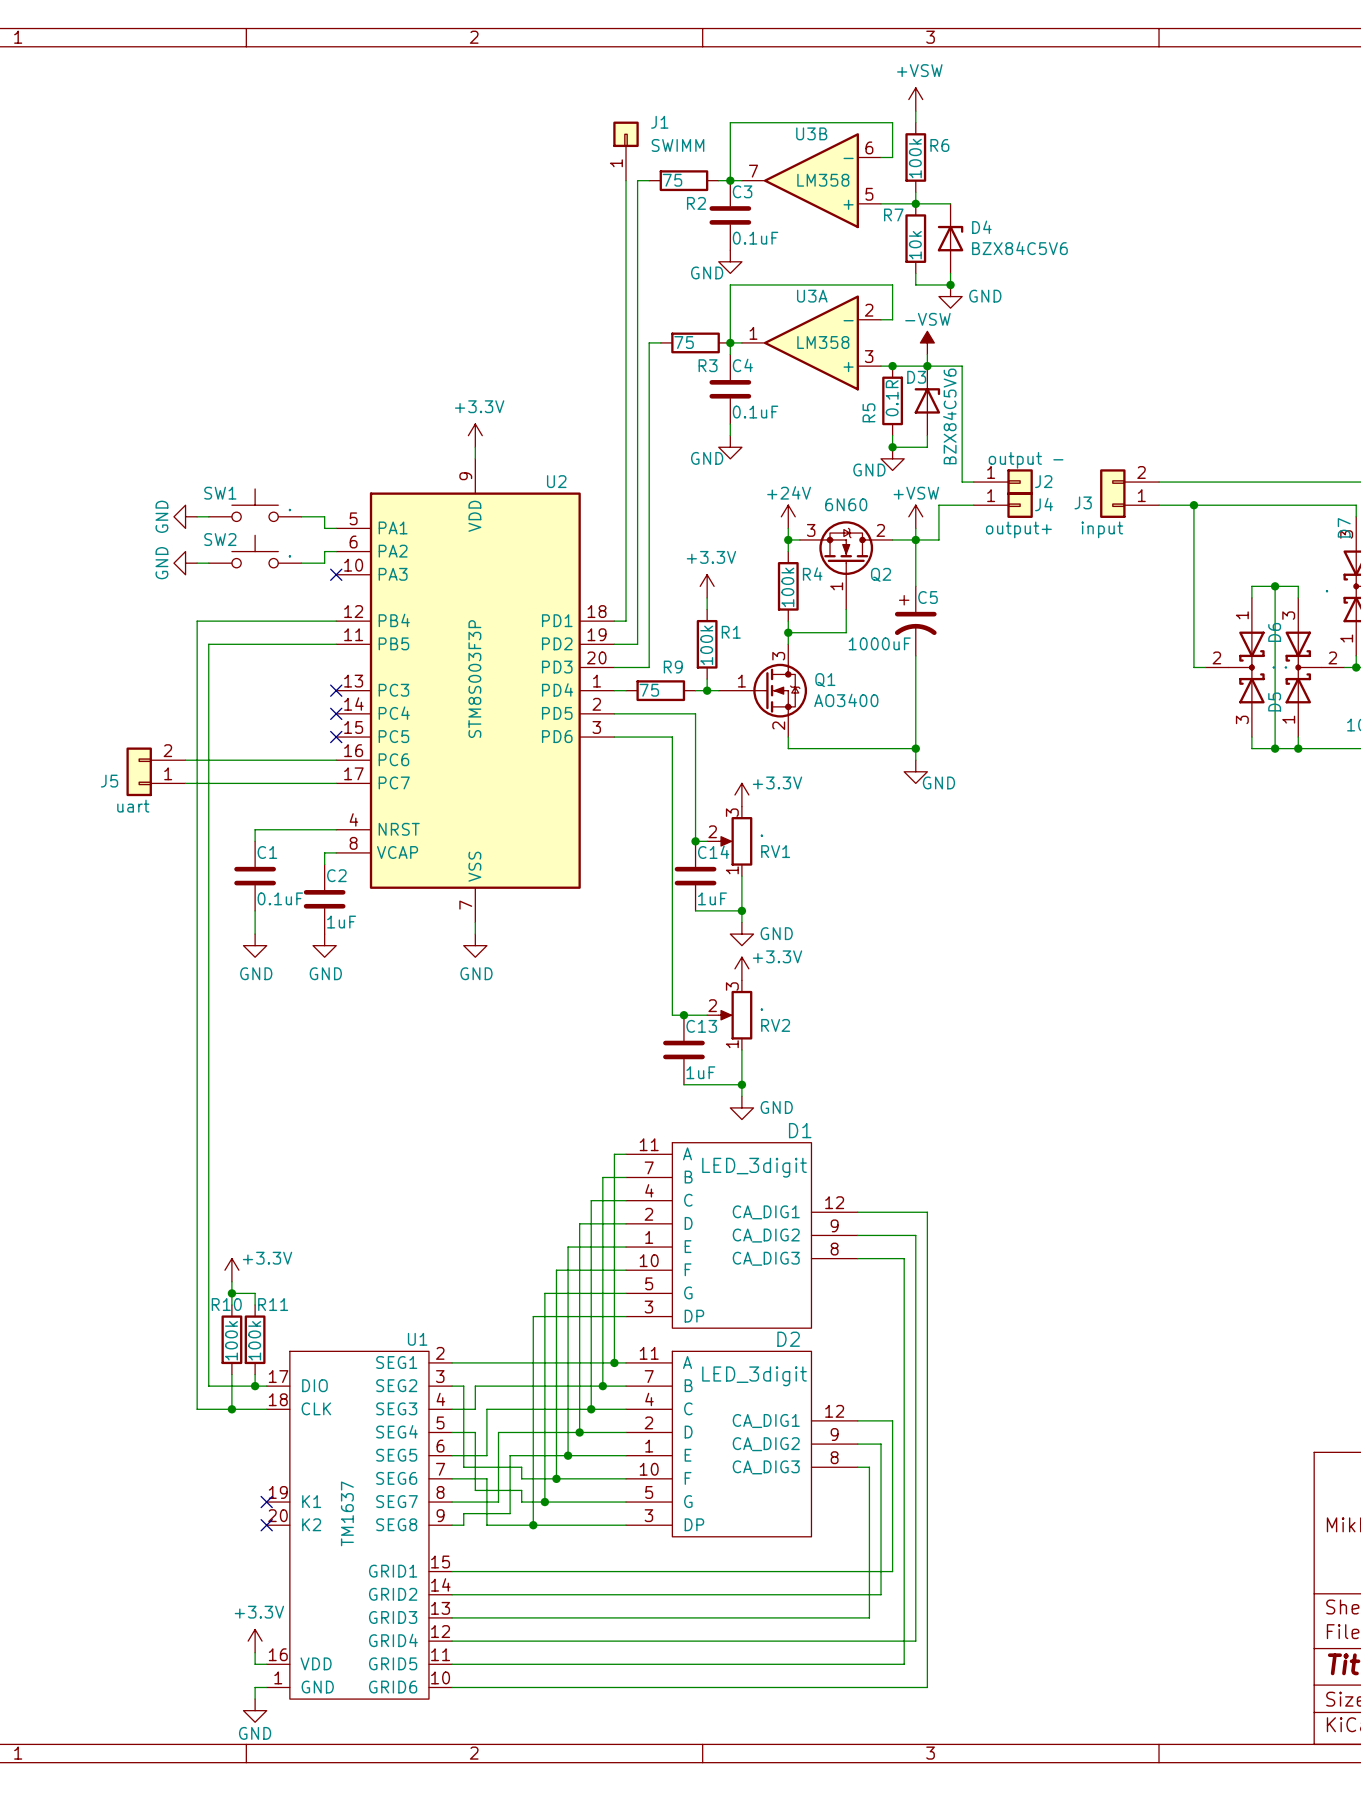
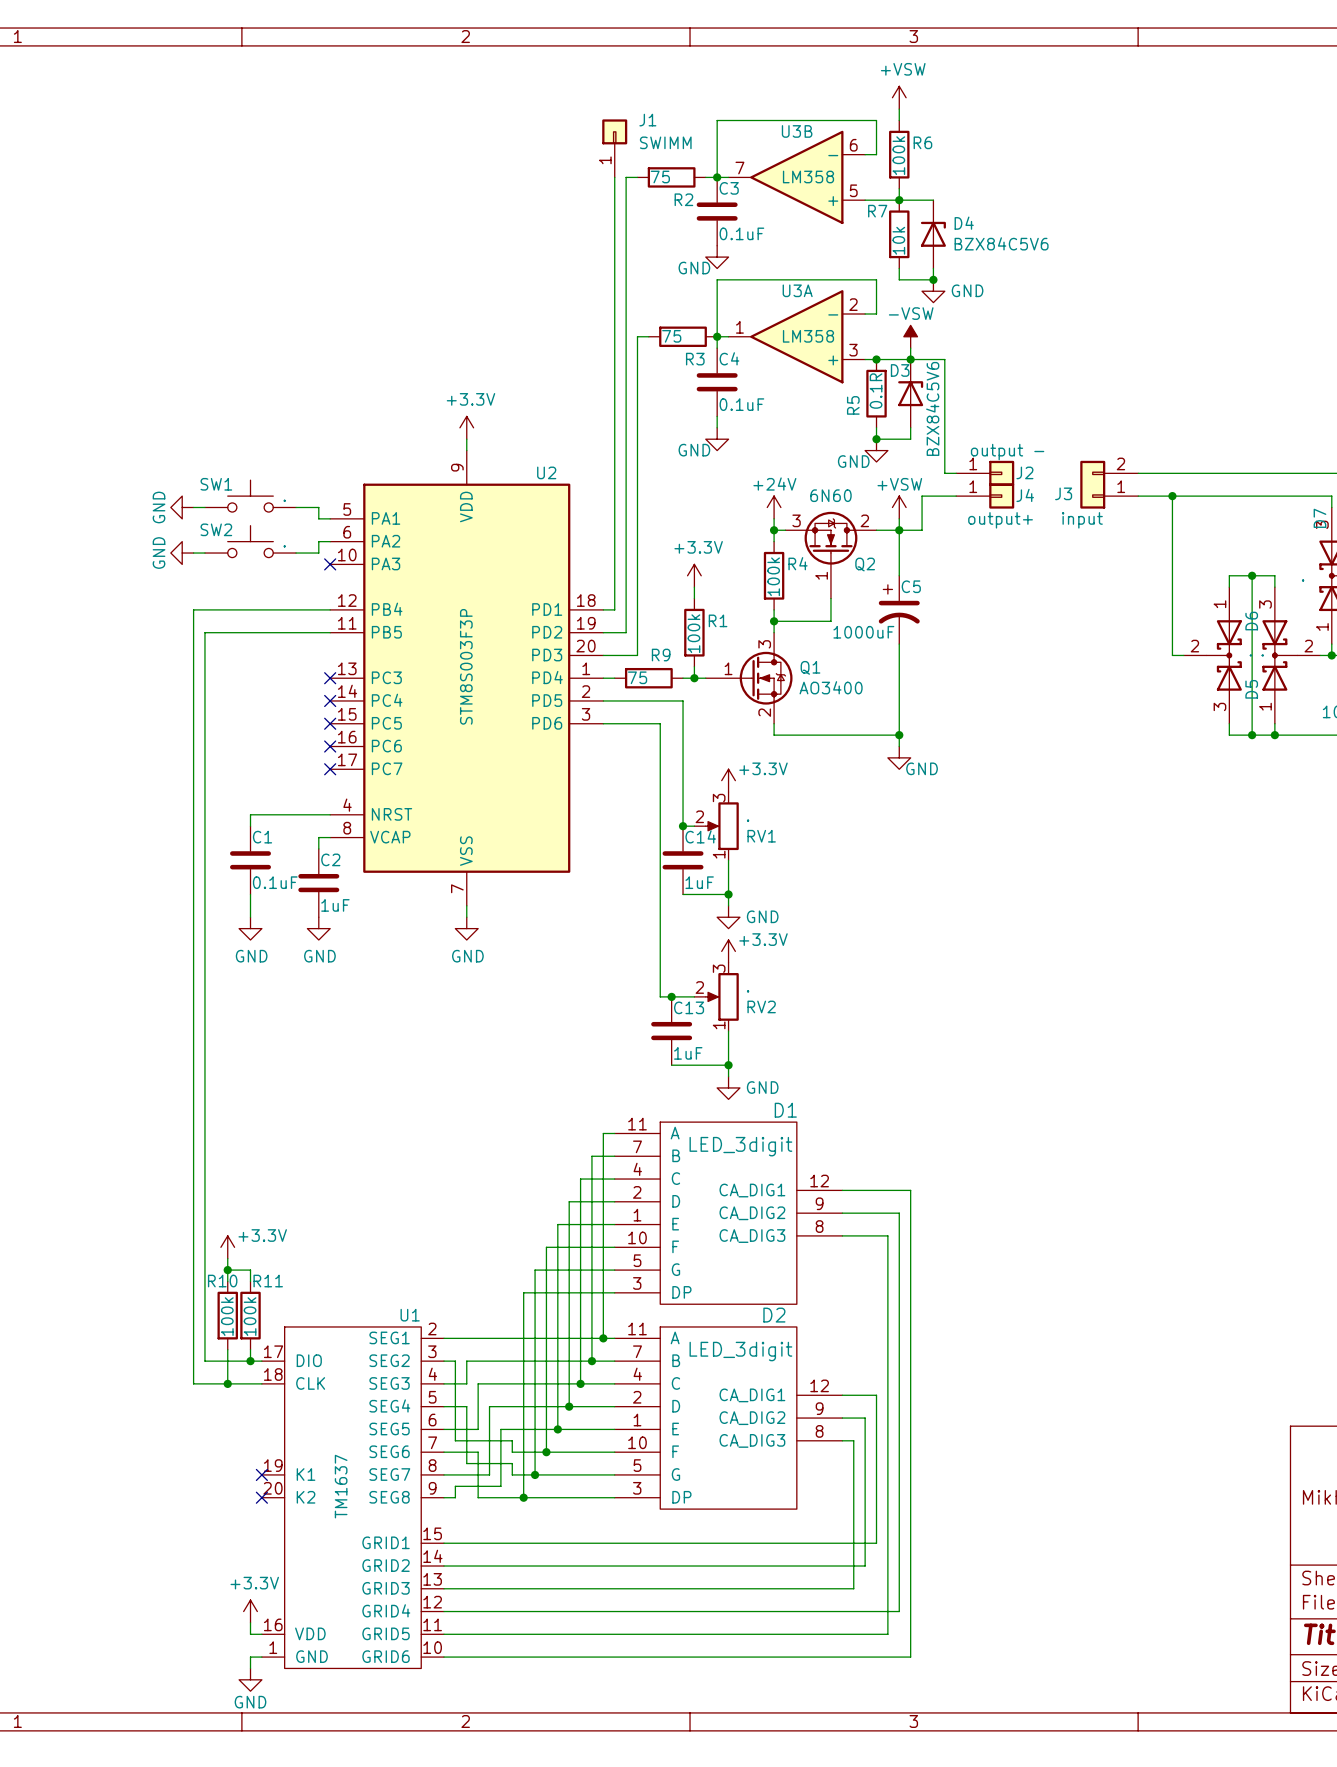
wire: (185, 760) (336, 760) -> none
no-connect mark: none -> (330, 746)
J5: uart (156, 771) -> none
wire: (185, 783) (336, 783) -> none
no-connect mark: none -> (330, 769)

